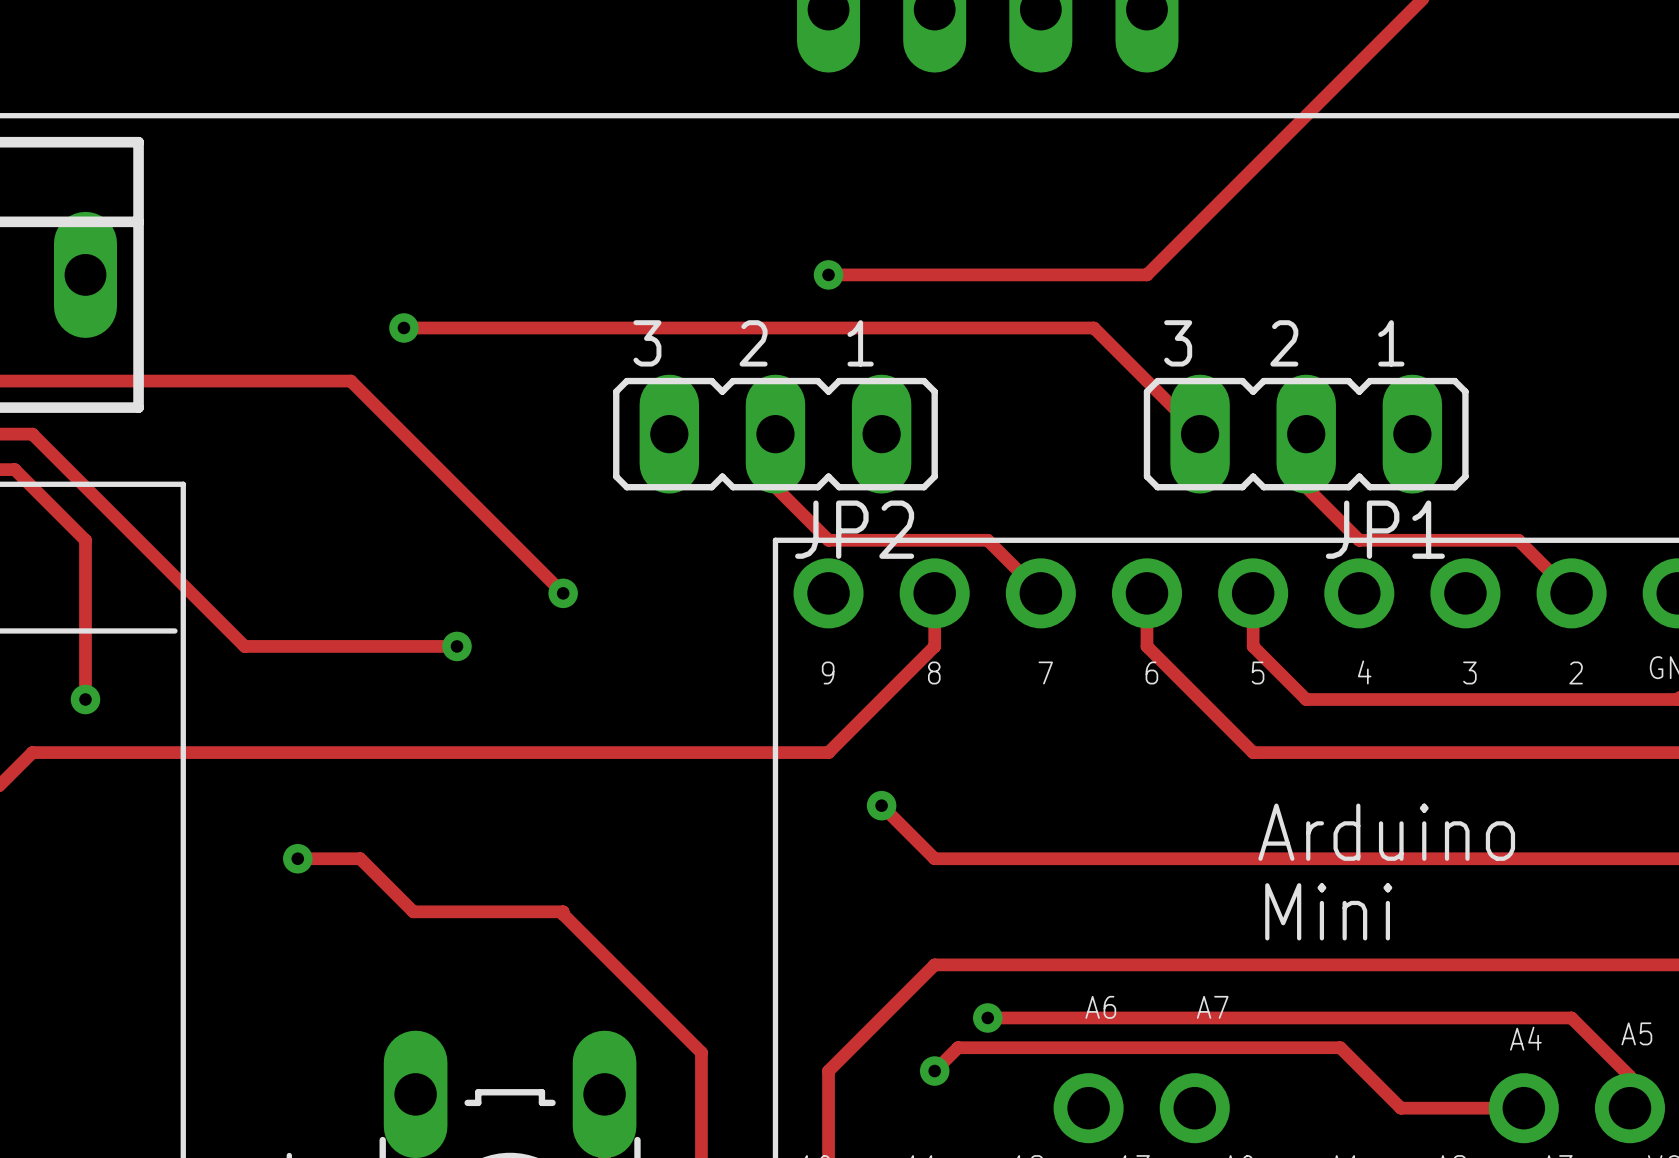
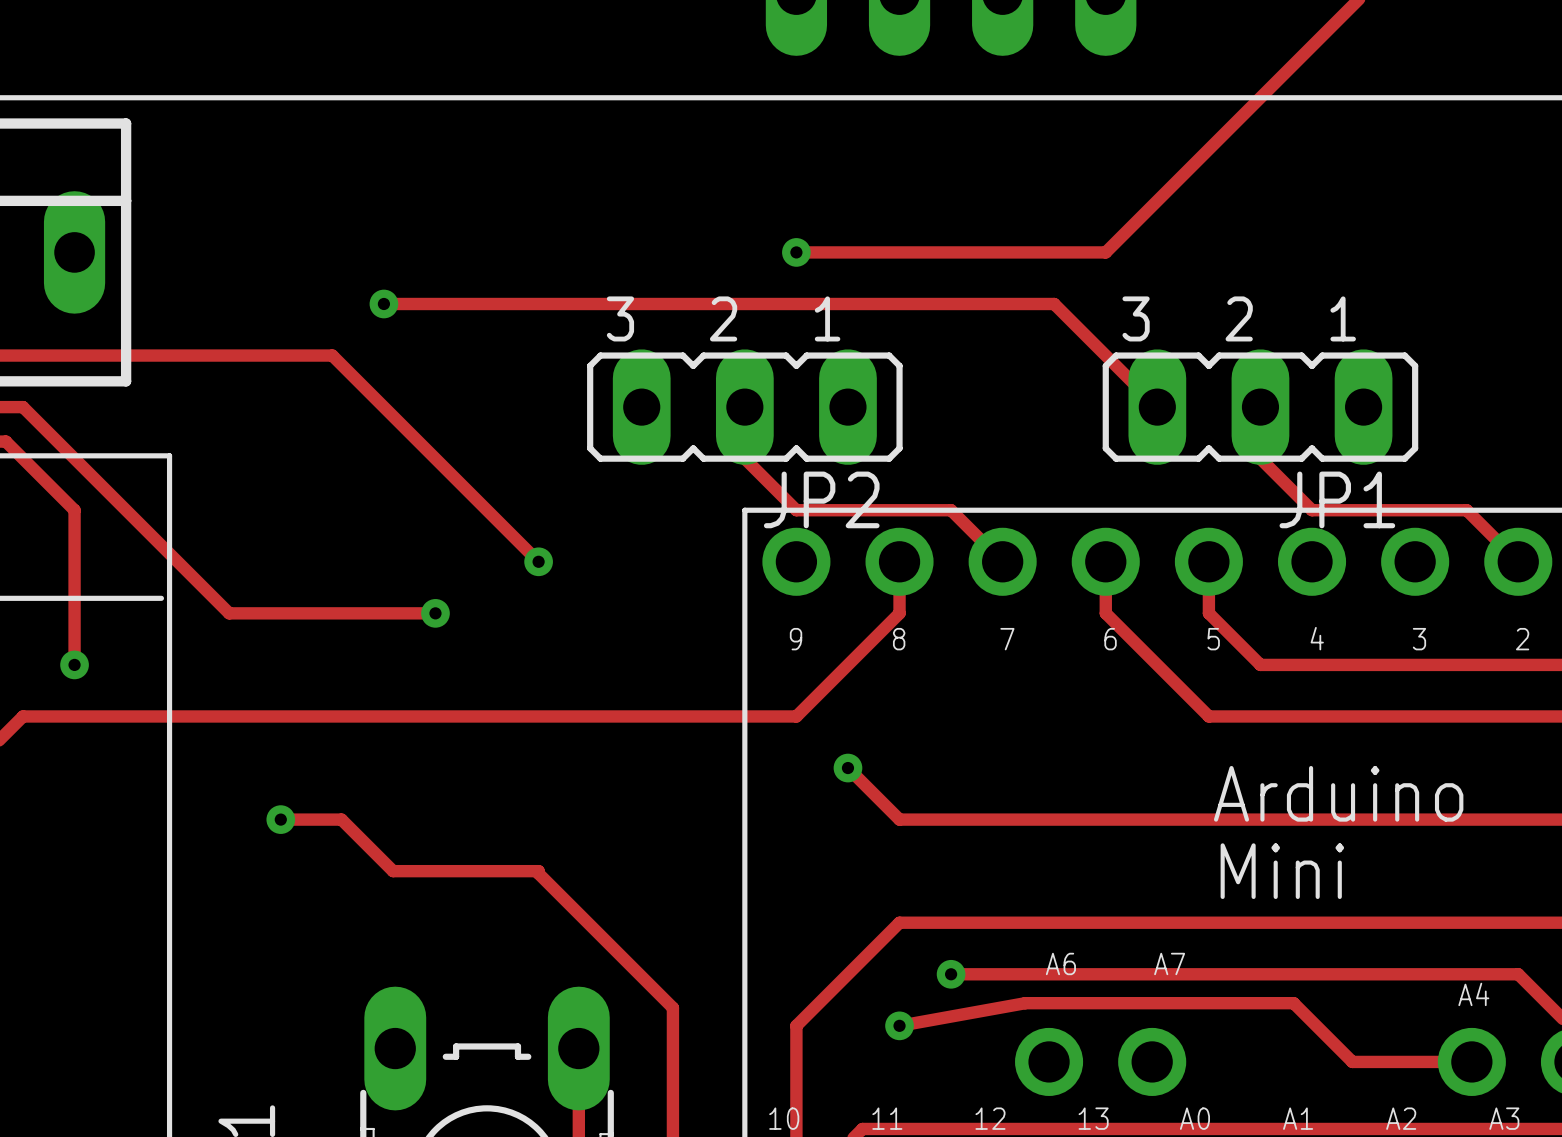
track: (1064, 1047) (958, 1047) (934, 1071) -> (1025, 1003) (899, 1025)

